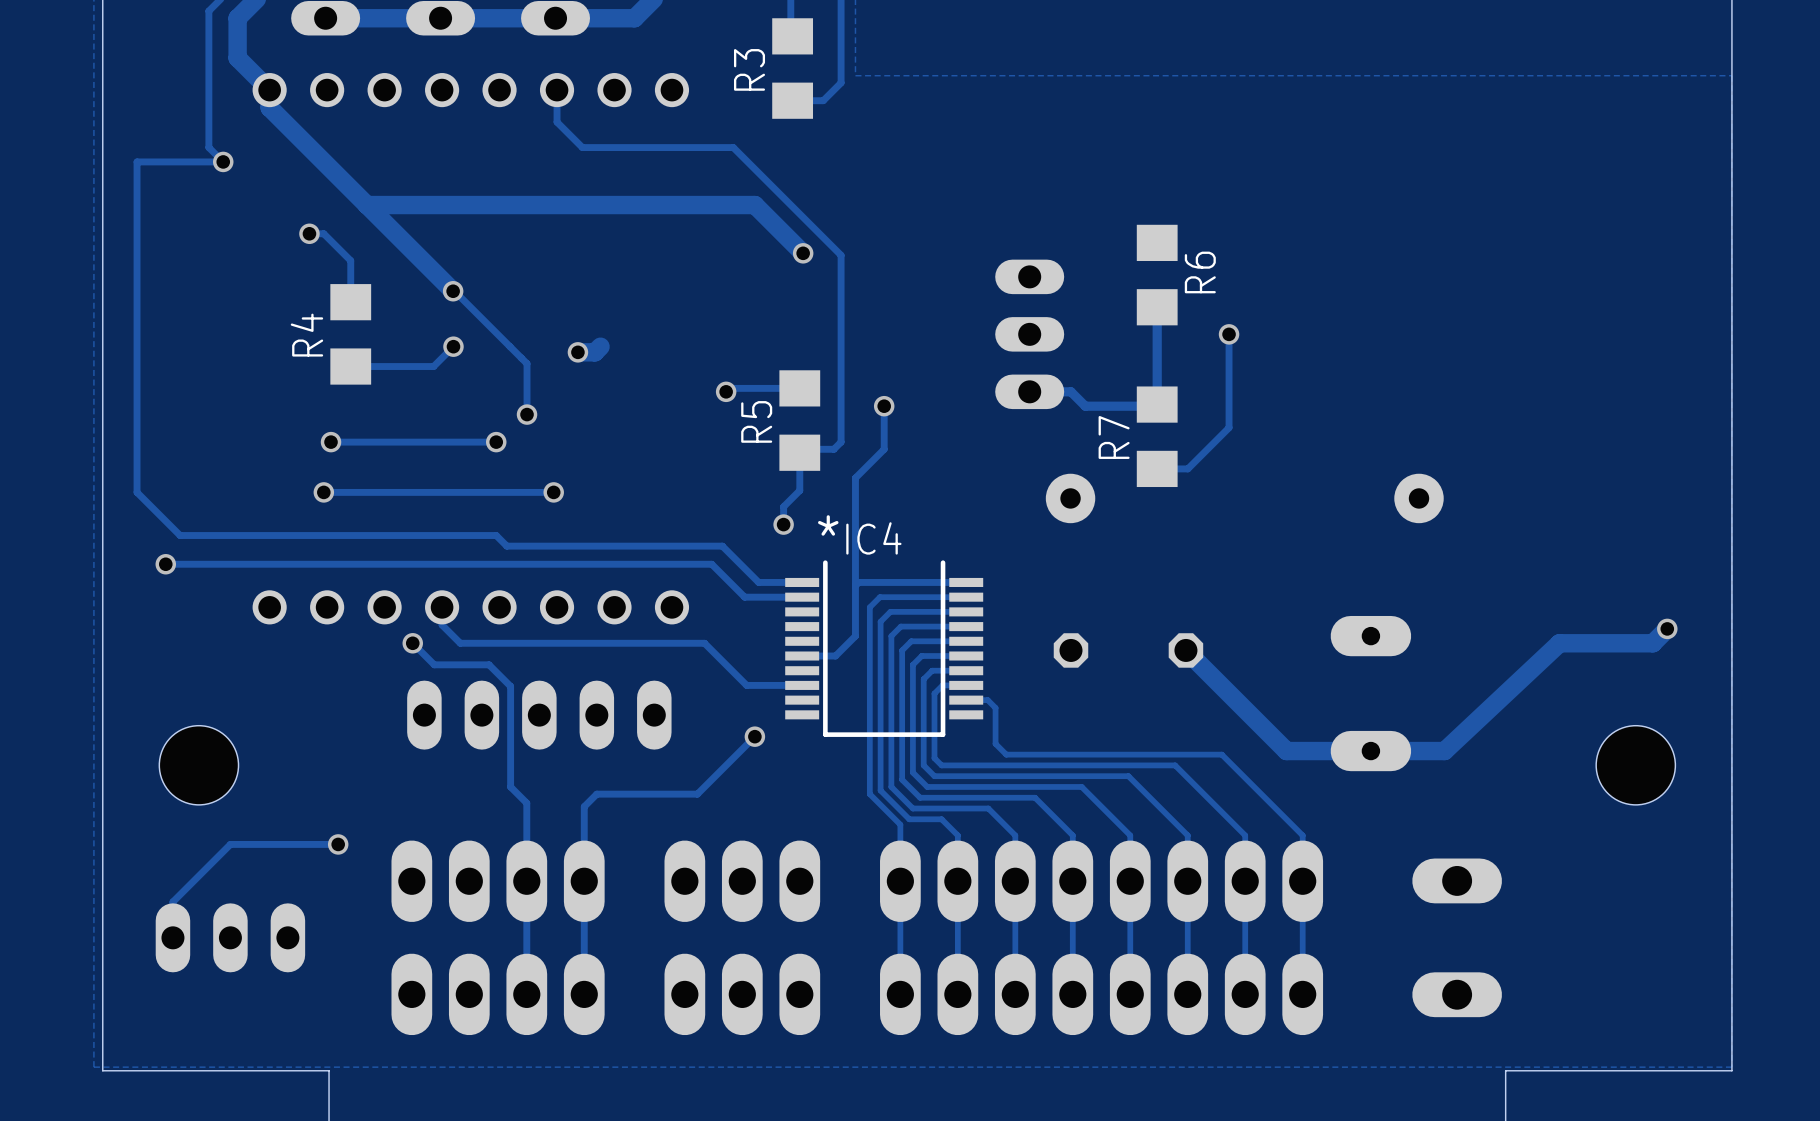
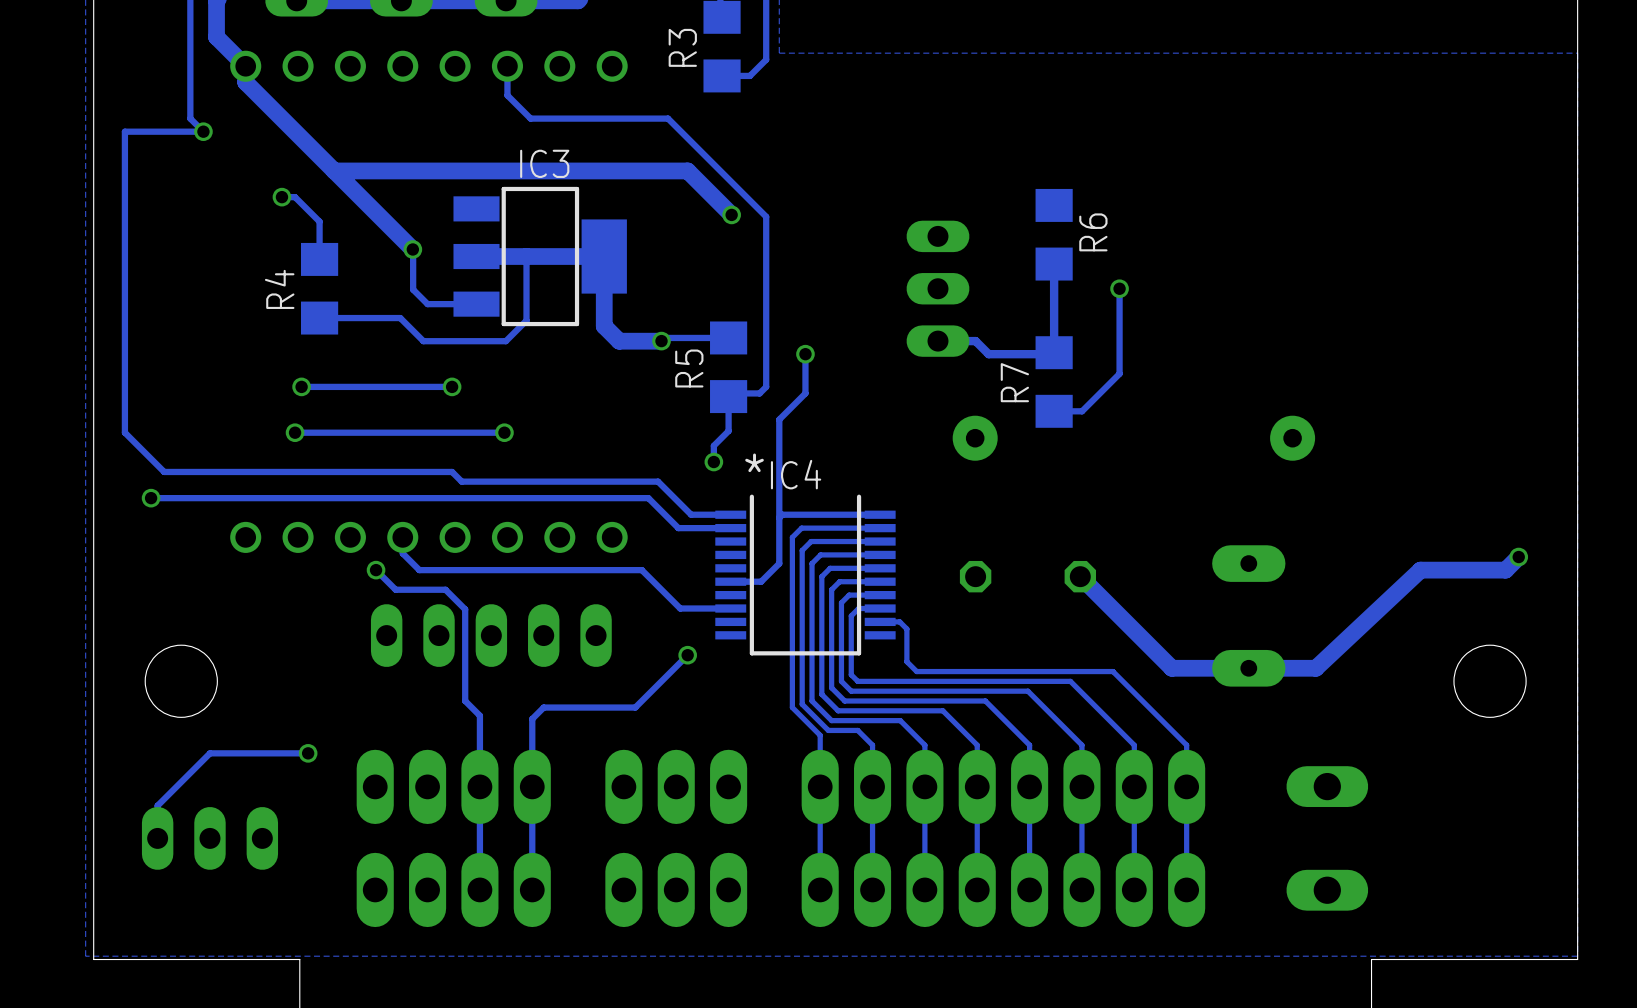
track: none -> (412, 249) (413, 289) (427, 304) (476, 304)
track: (454, 291) (527, 363) (527, 414) -> none
track: none -> (476, 256) (604, 256) (604, 326) (619, 341) (661, 341)
IC3: none -> (540, 256)
track: (453, 346) (433, 366) -> (526, 256) (526, 320) (505, 341) (423, 341) (400, 318) (395, 318)
via: (453, 346) -> none
track: (600, 346) (594, 352) (577, 352) -> none
via: (577, 352) -> none
via: (527, 414) -> none

